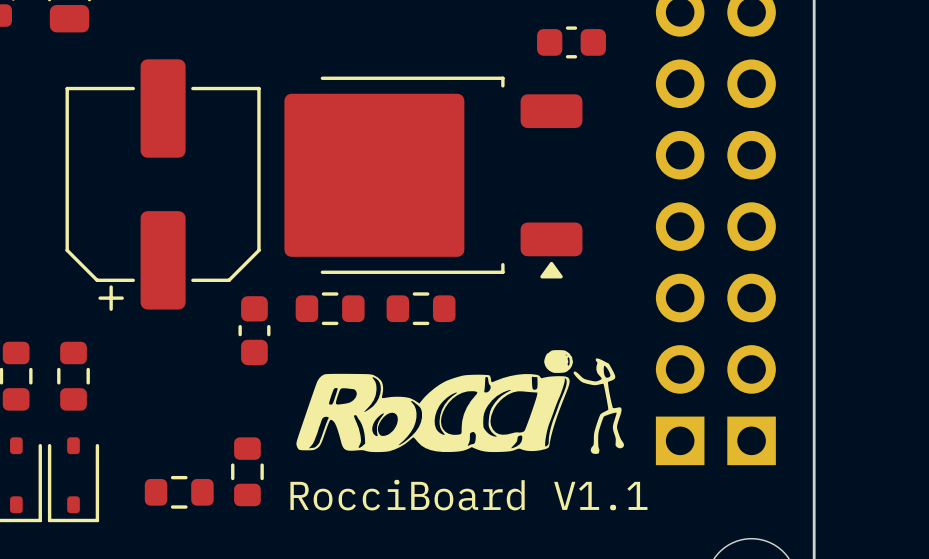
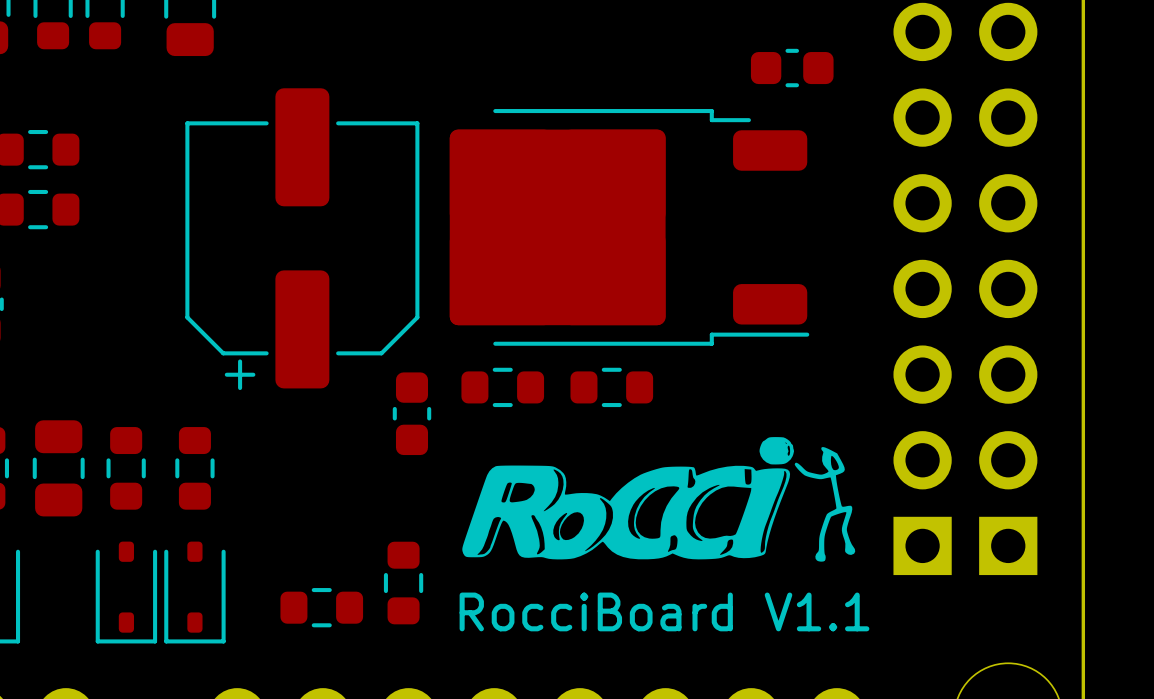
part footprint: [284, 76, 583, 279] -> [449, 109, 810, 346]

